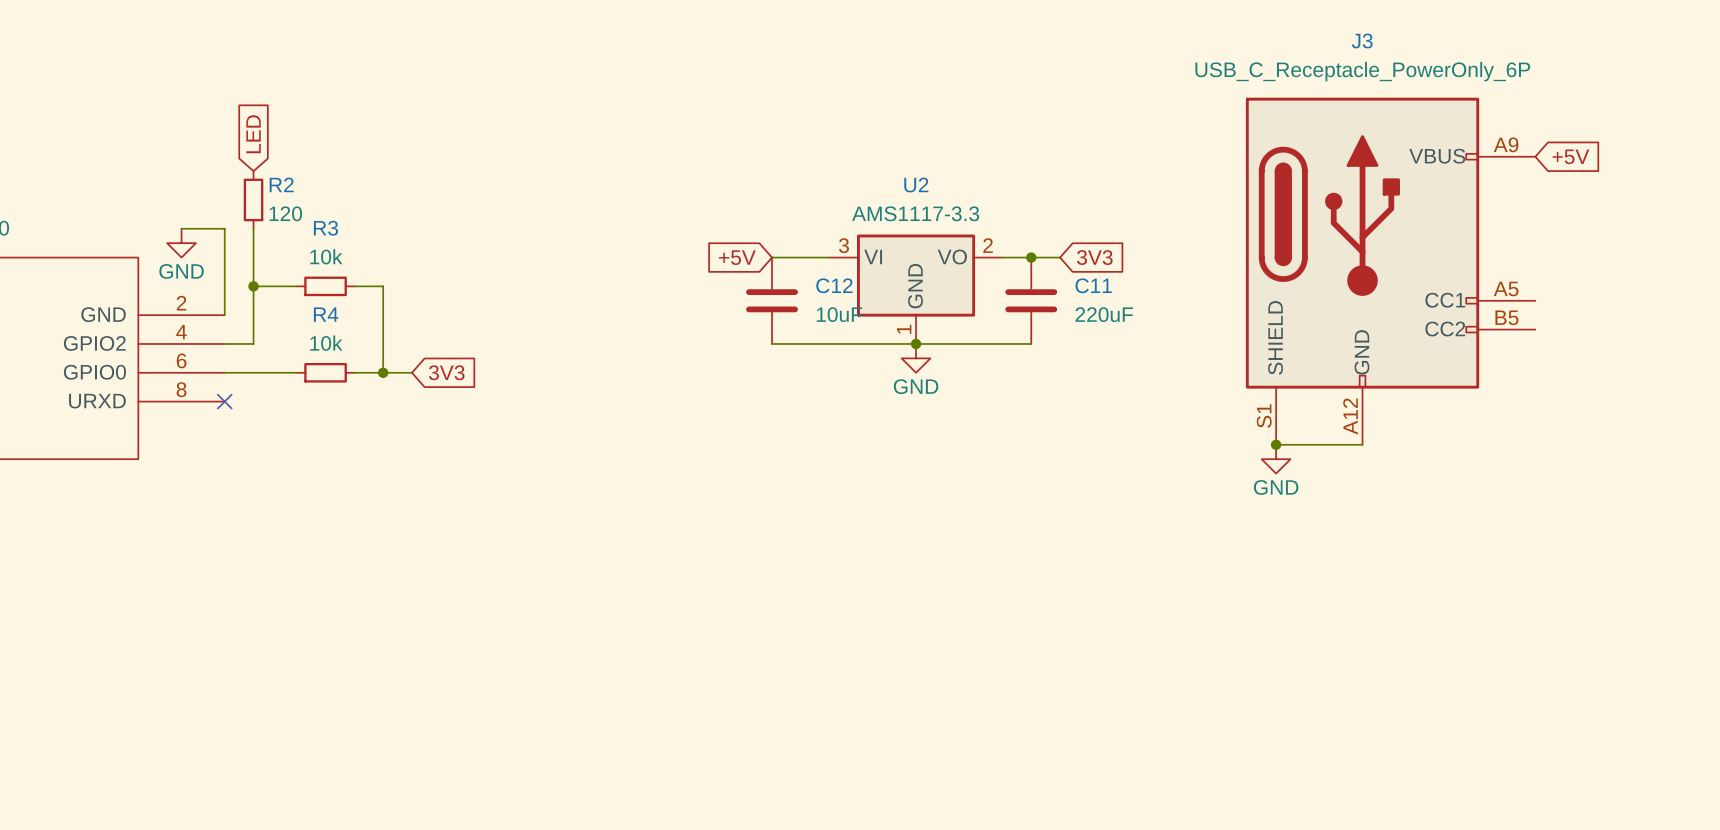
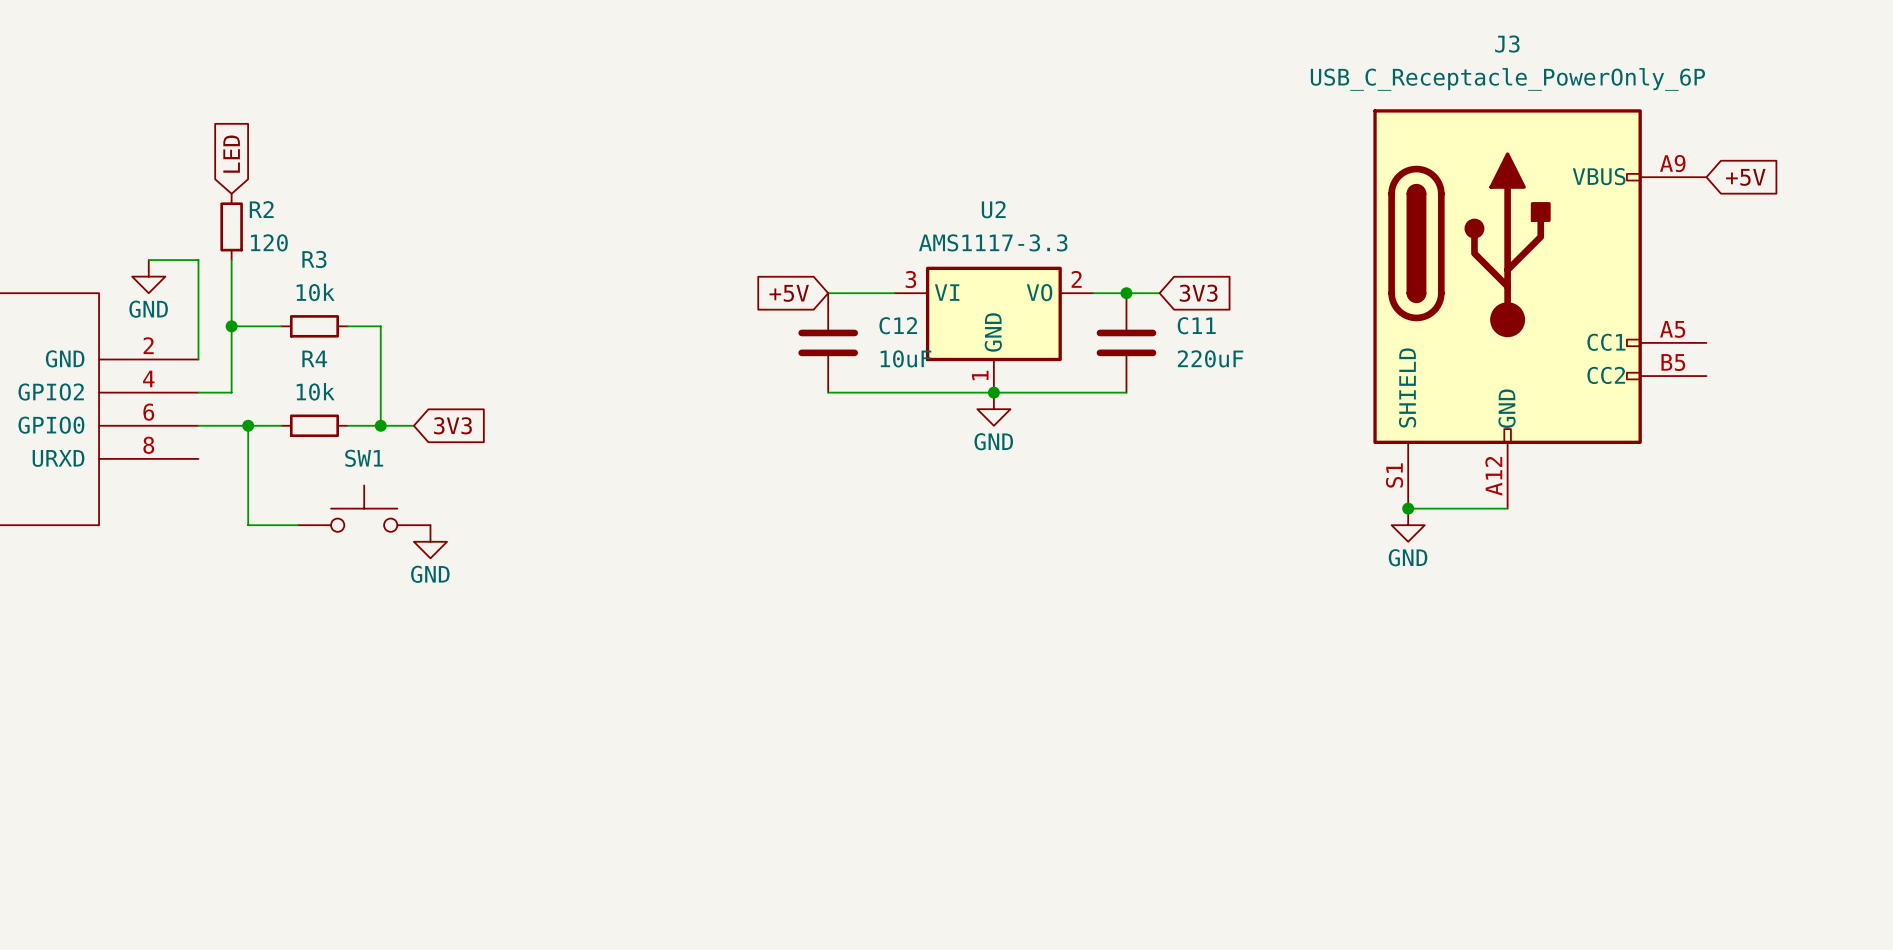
wire: none -> (248, 425) (248, 525) (297, 525)
junction: none -> (248, 425)
no-connect mark: (224, 401) -> none
SW1: none -> (364, 508)
power symbol: none -> GND (430, 541)

